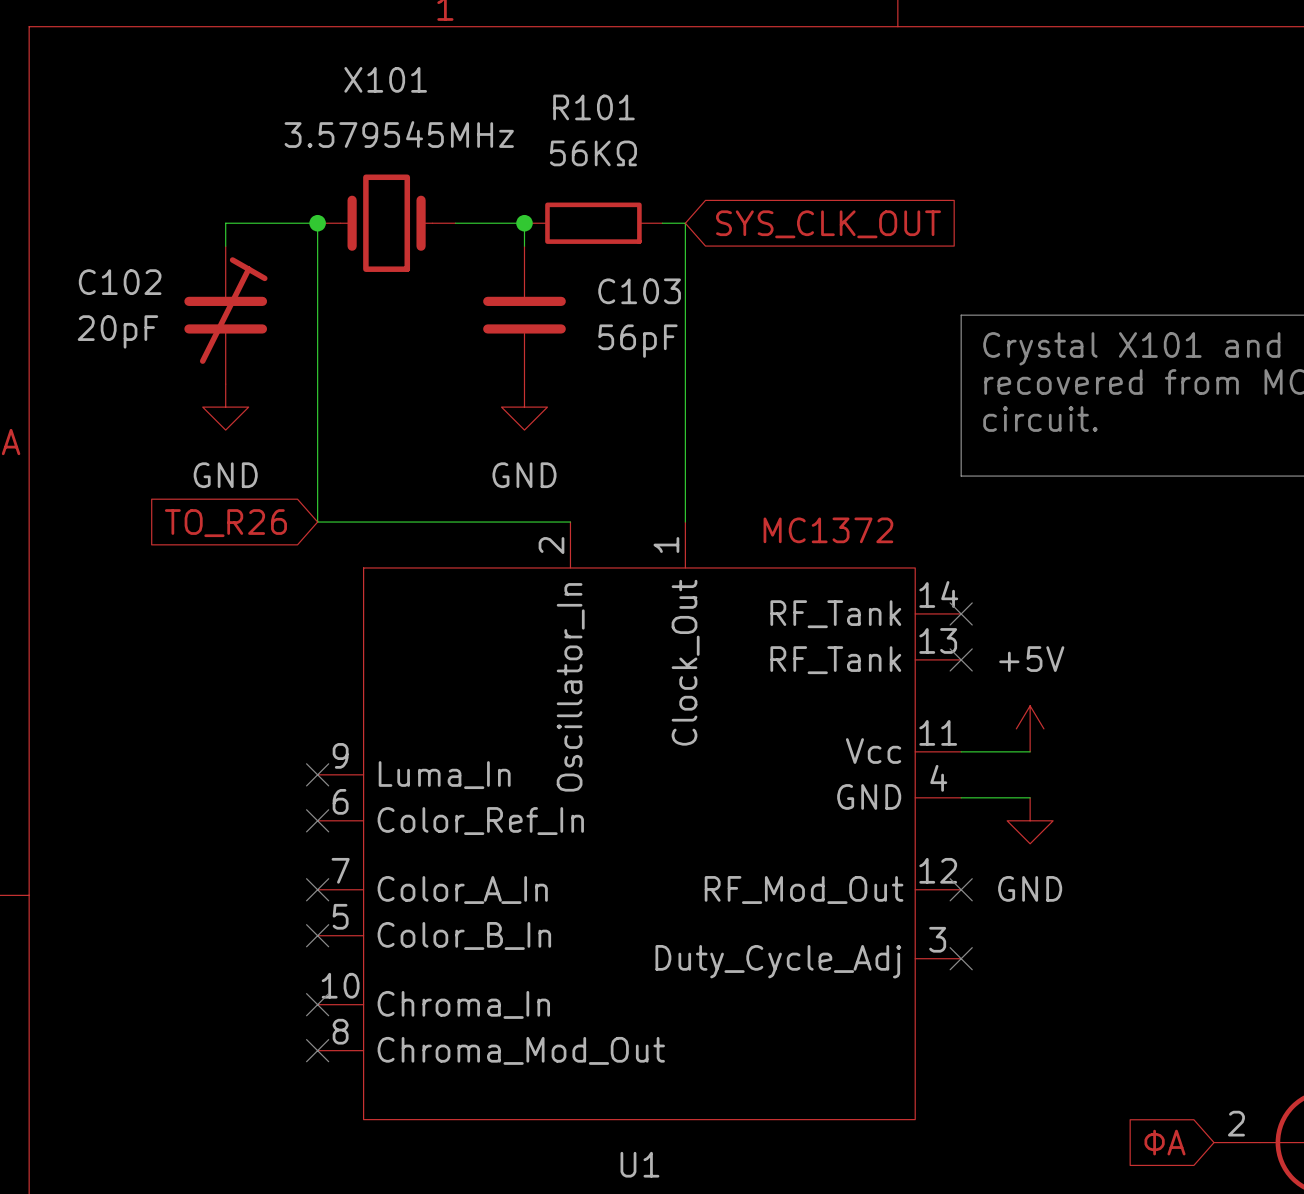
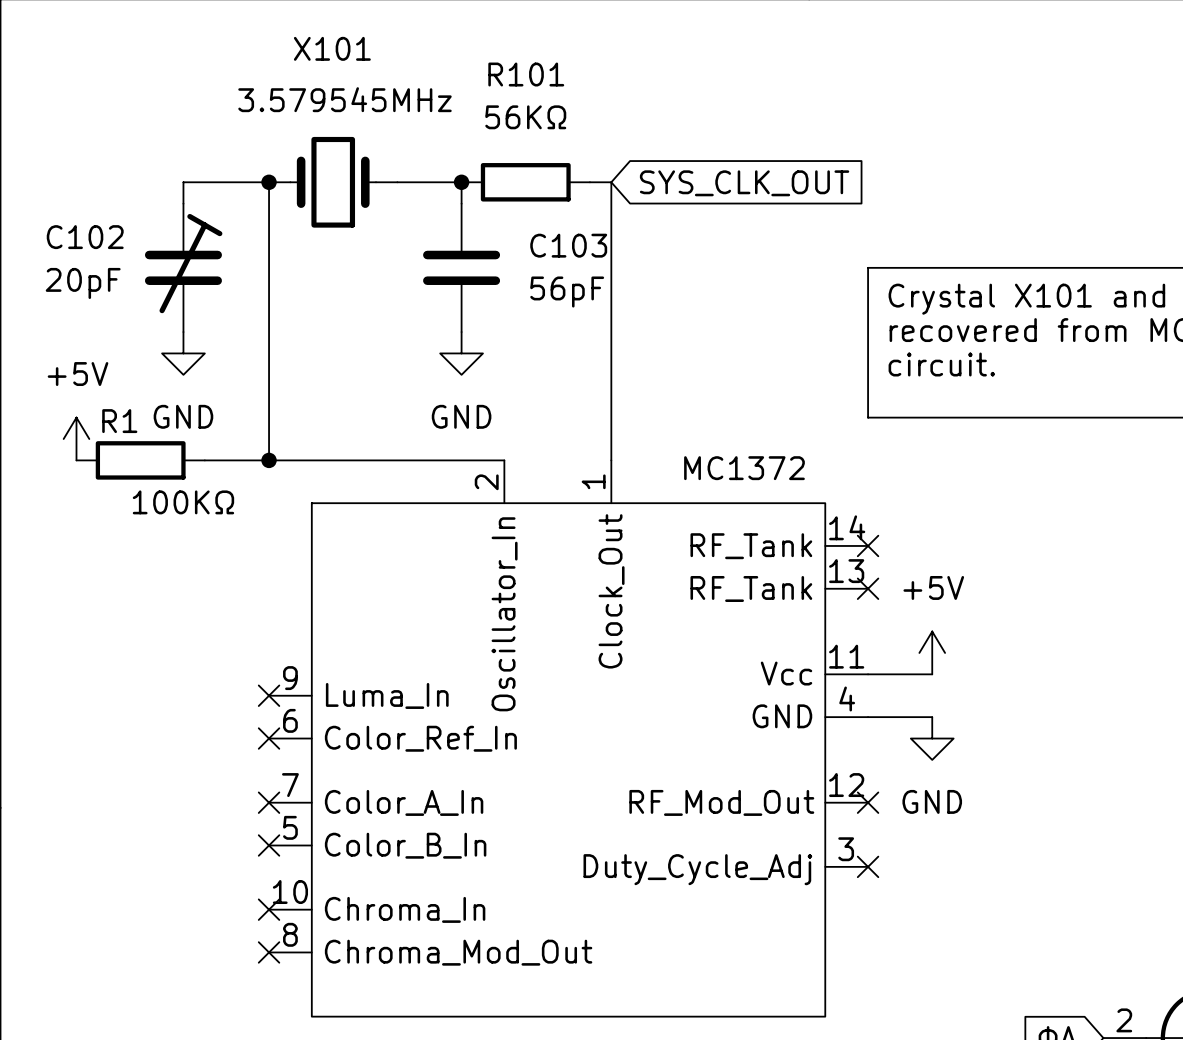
power symbol: none -> +5V (76, 439)
R1: none -> 100KΩ (140, 460)
wire: none -> (204, 460) (269, 460)
junction: none -> (269, 460)
global label: TO_R26 (225, 523) -> none

